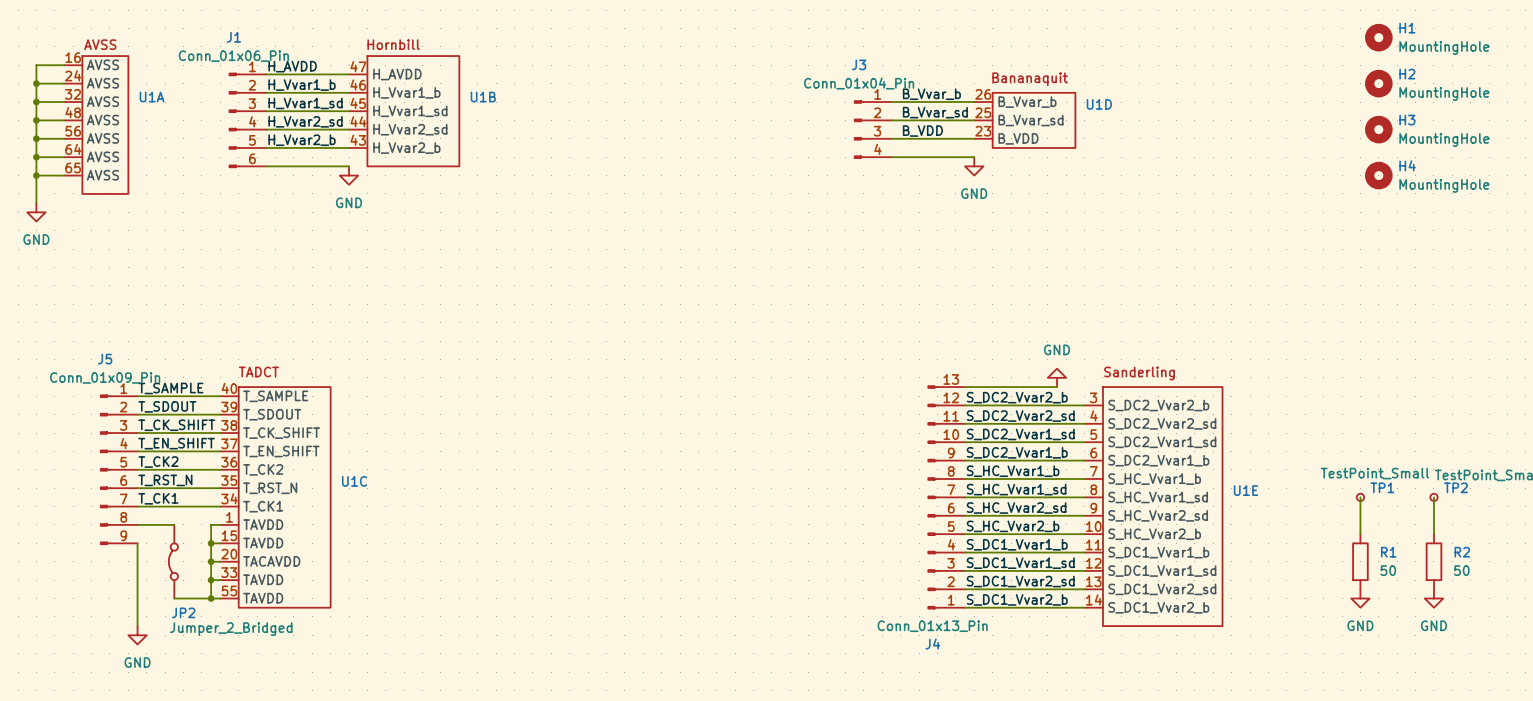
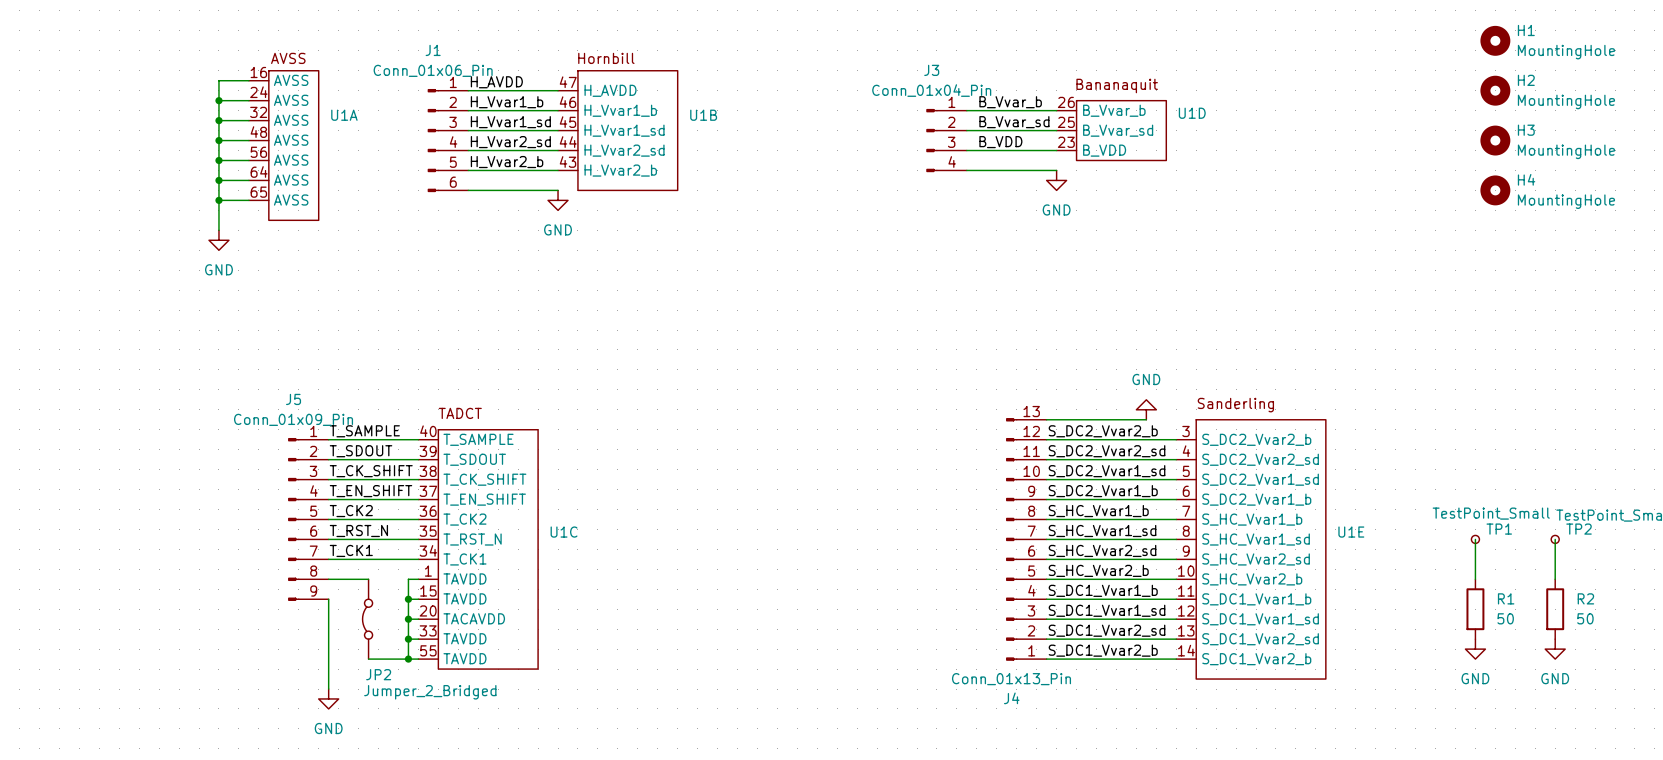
wire: (63, 65) (36, 65) (36, 203) -> (248, 80) (218, 80) (218, 230)
label position: H_AVDD (292, 66) -> H_AVDD (496, 82)
wire: (266, 74) (349, 74) -> (468, 90) (558, 90)
wire: (36, 83) (63, 83) -> (218, 100) (248, 100)
junction: (36, 83) -> none
label position: H_Vvar1_b (302, 85) -> H_Vvar1_b (507, 102)
junction: none -> (218, 100)
wire: (266, 92) (349, 92) -> (468, 110) (558, 110)
wire: (36, 102) (63, 102) -> (218, 120) (248, 120)
junction: (36, 102) -> none
label position: H_Vvar1_sd (305, 103) -> H_Vvar1_sd (510, 122)
junction: none -> (218, 120)
wire: (266, 111) (349, 111) -> (468, 130) (558, 130)
U1B position: (404, 111) -> (617, 130)
wire: (36, 120) (63, 120) -> (218, 140) (248, 140)
junction: (36, 120) -> none
J1 position: (247, 120) -> (448, 140)
label position: H_Vvar2_sd (305, 121) -> H_Vvar2_sd (510, 142)
U1A position: (96, 125) -> (283, 145)
junction: none -> (218, 140)
wire: (266, 129) (349, 129) -> (468, 150) (558, 150)
wire: (36, 138) (63, 138) -> (218, 160) (248, 160)
junction: (36, 138) -> none
label position: H_Vvar2_b (302, 140) -> H_Vvar2_b (507, 162)
junction: none -> (218, 160)
wire: (266, 147) (349, 147) -> (468, 170) (558, 170)
wire: (36, 157) (63, 157) -> (218, 180) (248, 180)
junction: (36, 157) -> none
junction: none -> (218, 180)
wire: (266, 166) (349, 166) -> (468, 190) (558, 190)
wire: (36, 175) (63, 175) -> (218, 200) (248, 200)
junction: (36, 175) -> none
power symbol: GND (349, 175) -> none
junction: none -> (218, 200)
power symbol: none -> GND (558, 200)
power symbol: GND (36, 212) -> none
power symbol: none -> GND (218, 240)
label position: T_SAMPLE (170, 388) -> T_SAMPLE (364, 431)
wire: (137, 396) (220, 396) -> (328, 439) (418, 439)
label position: T_SDOUT (167, 406) -> T_SDOUT (361, 451)
wire: (137, 414) (220, 414) -> (328, 459) (418, 459)
label position: T_CK_SHIFT (176, 425) -> T_CK_SHIFT (371, 471)
wire: (137, 433) (220, 433) -> (328, 479) (418, 479)
label position: T_EN_SHIFT (176, 443) -> T_EN_SHIFT (371, 491)
wire: (137, 451) (220, 451) -> (328, 499) (418, 499)
label position: T_CK2 (158, 462) -> T_CK2 (351, 511)
J5 position: (118, 469) -> (308, 519)
wire: (137, 469) (220, 469) -> (328, 519) (418, 519)
label position: T_RST_N (165, 480) -> T_RST_N (358, 531)
wire: (137, 488) (220, 488) -> (328, 539) (418, 539)
U1C position: (275, 497) -> (478, 549)
label position: T_CK1 (158, 498) -> T_CK1 (351, 550)
wire: (137, 506) (220, 506) -> (328, 559) (418, 559)
wire: (137, 524) (174, 524) -> (328, 579) (368, 579)
wire: (220, 524) (211, 524) (211, 598) -> (418, 579) (408, 579) (408, 659)
wire: (137, 543) (137, 626) -> (328, 599) (328, 689)
wire: (211, 543) (220, 543) -> (408, 599) (418, 599)
junction: (211, 543) -> none
junction: none -> (408, 599)
JP2 position: (173, 561) -> (367, 619)
wire: (211, 561) (220, 561) -> (408, 619) (418, 619)
junction: (211, 561) -> none
junction: none -> (408, 619)
wire: (211, 580) (220, 580) -> (408, 639) (418, 639)
junction: (211, 580) -> none
junction: none -> (408, 639)
wire: (174, 598) (220, 598) -> (368, 659) (418, 659)
junction: (211, 598) -> none
junction: none -> (408, 659)
power symbol position: GND (137, 635) -> GND (328, 698)

